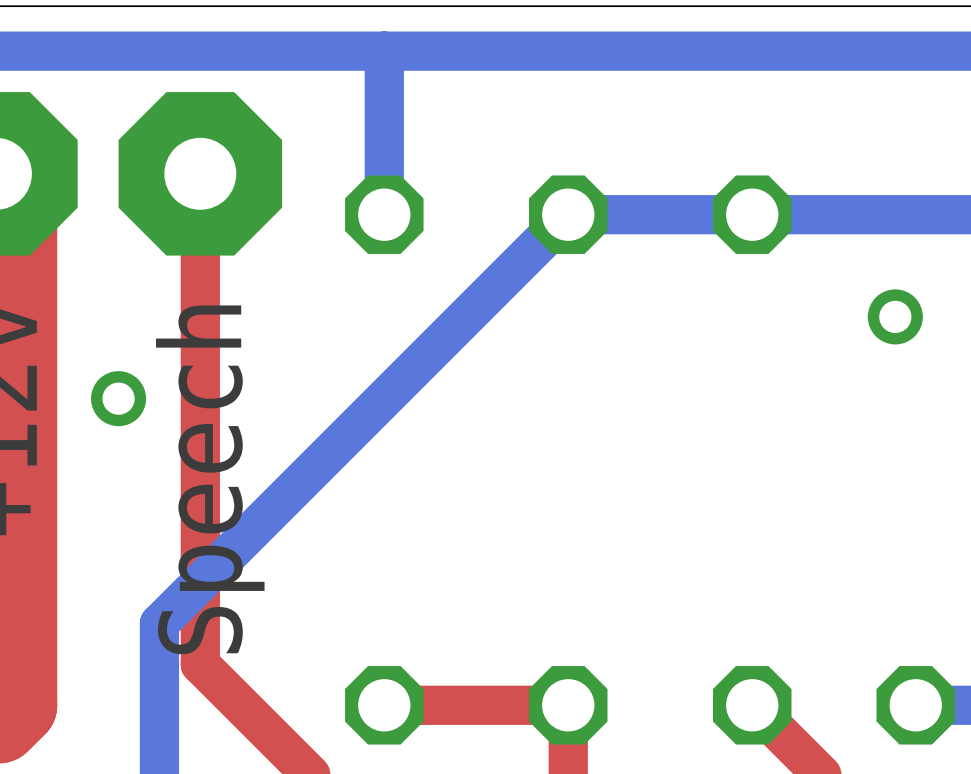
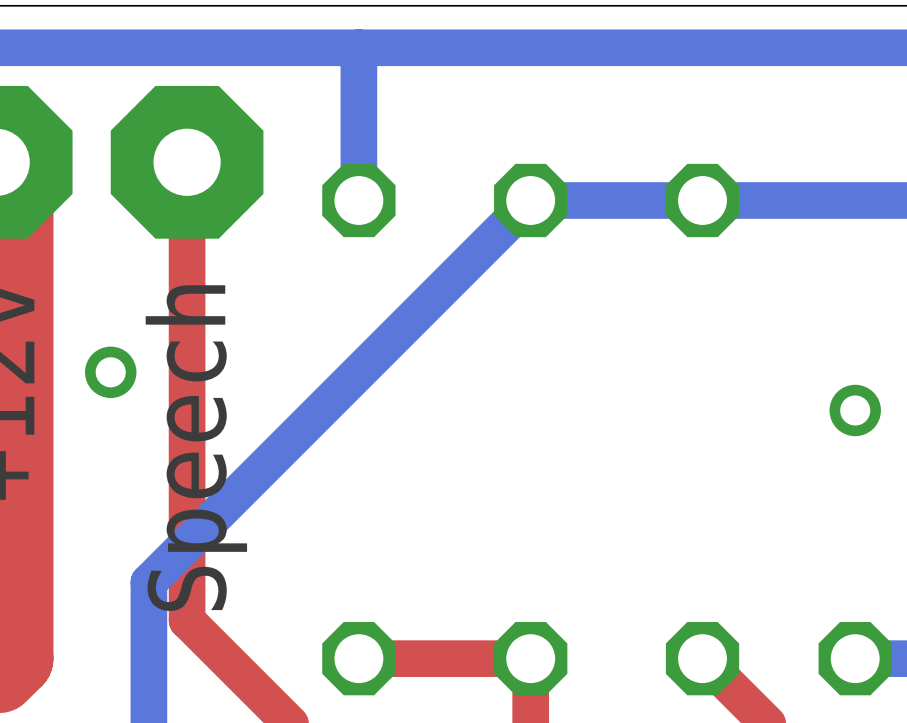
via position: (895, 316) -> (855, 410)

